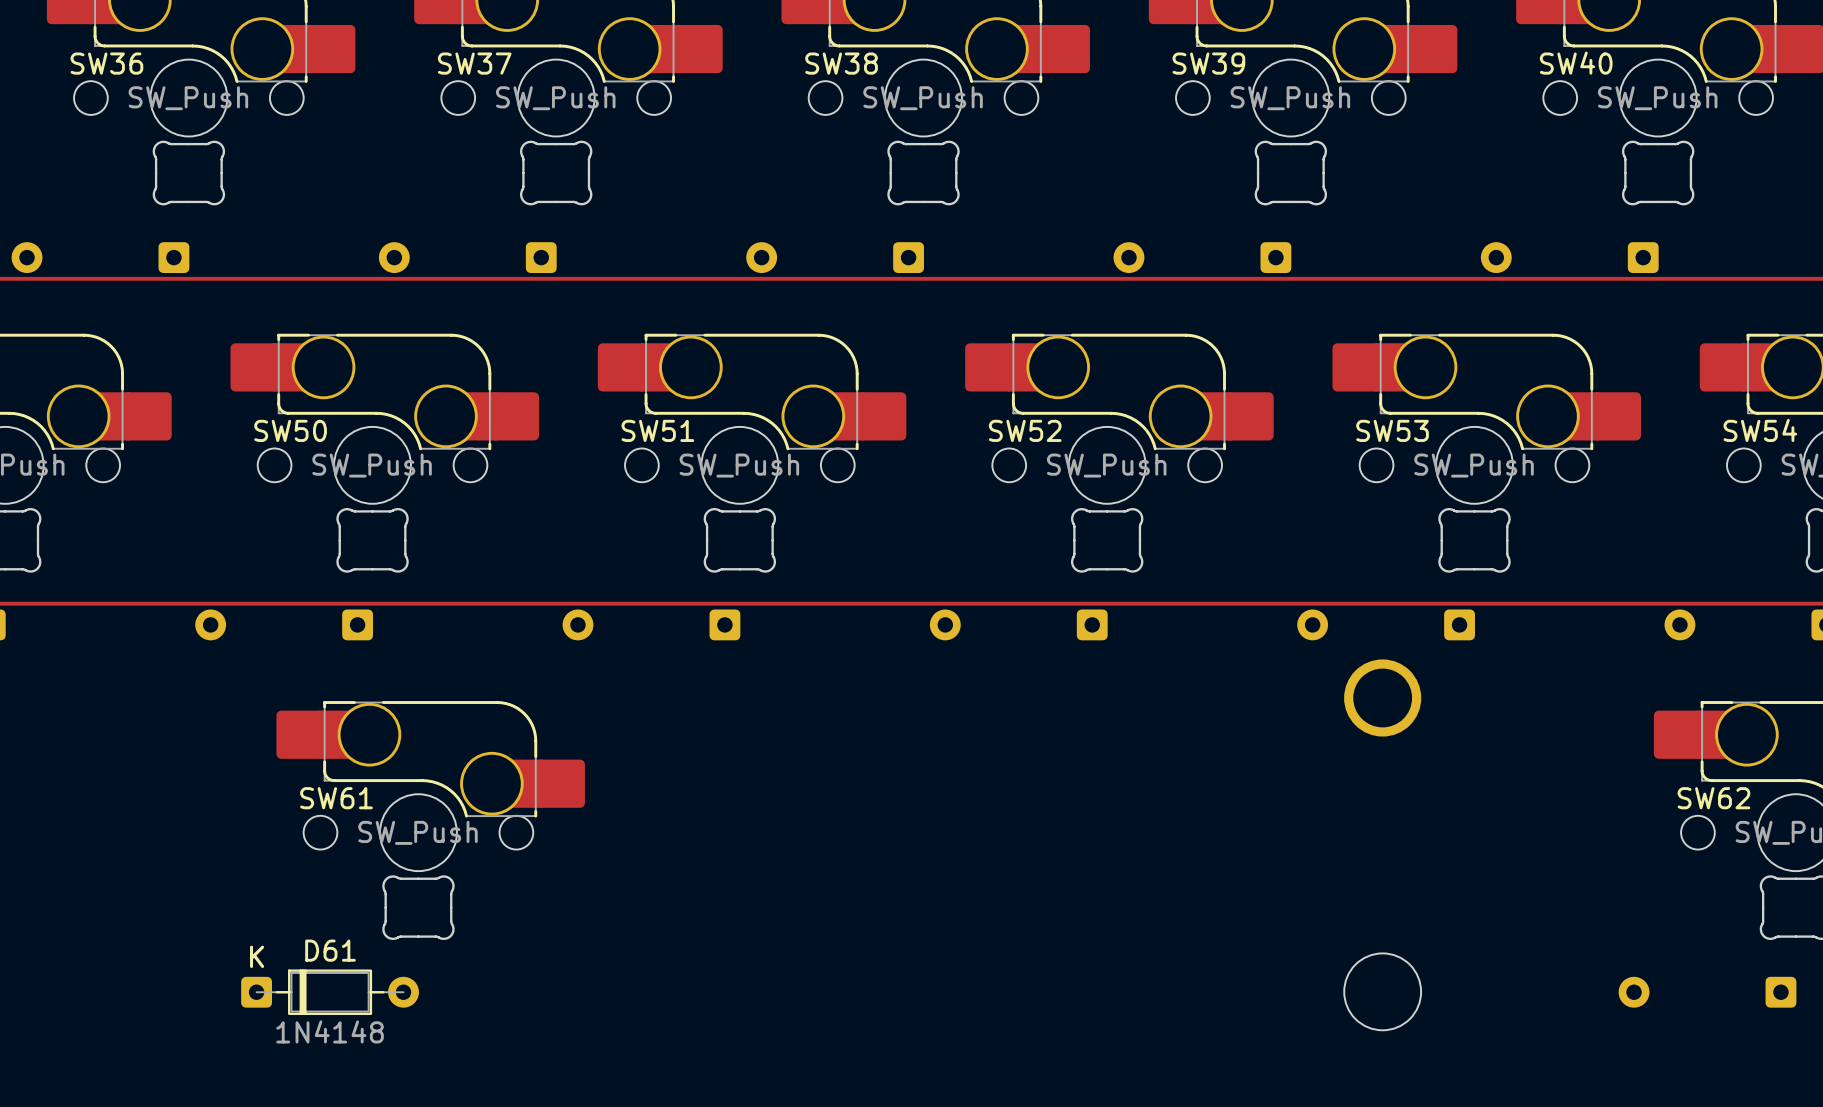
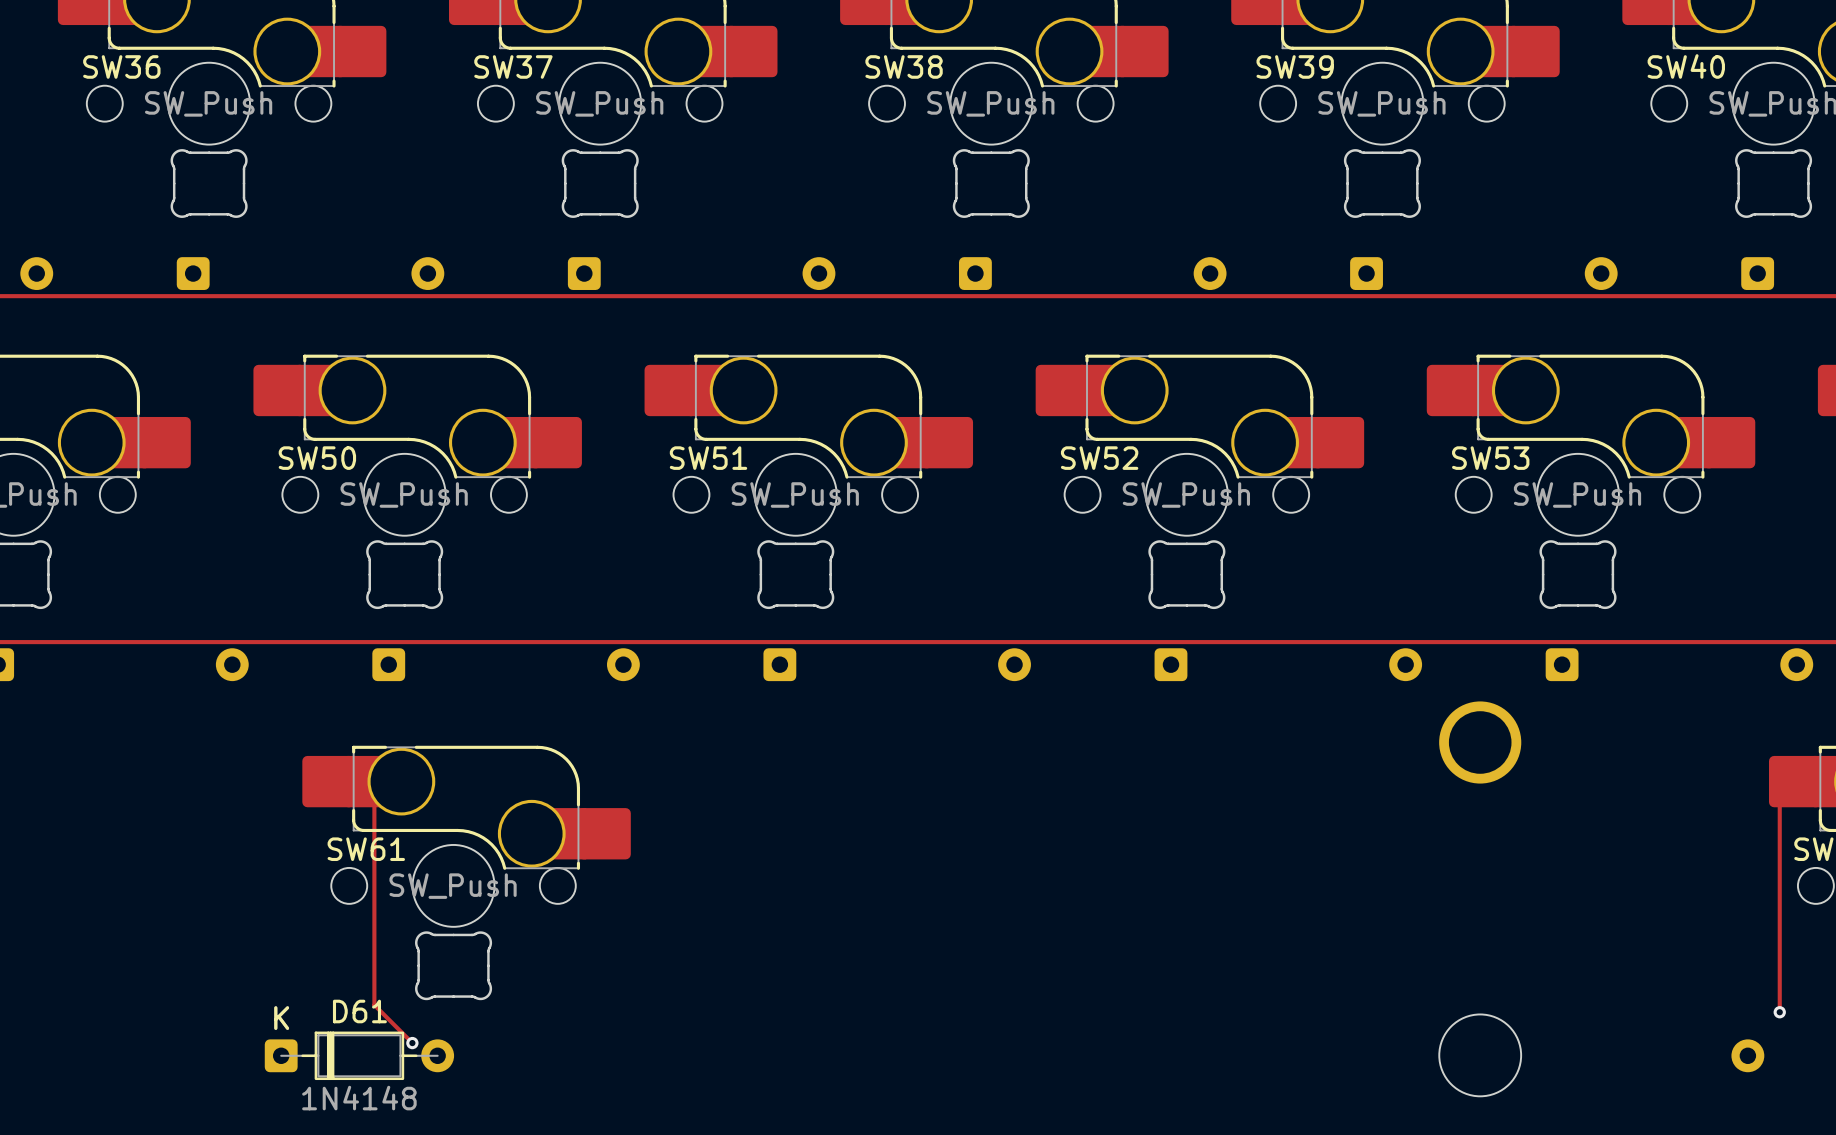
track: none -> (364, 781) (374, 791) (374, 1005) (412, 1043)
track: none -> (1795, 781) (1779, 797) (1779, 1012)
via: none -> (1779, 1012)
via: none -> (412, 1043)

